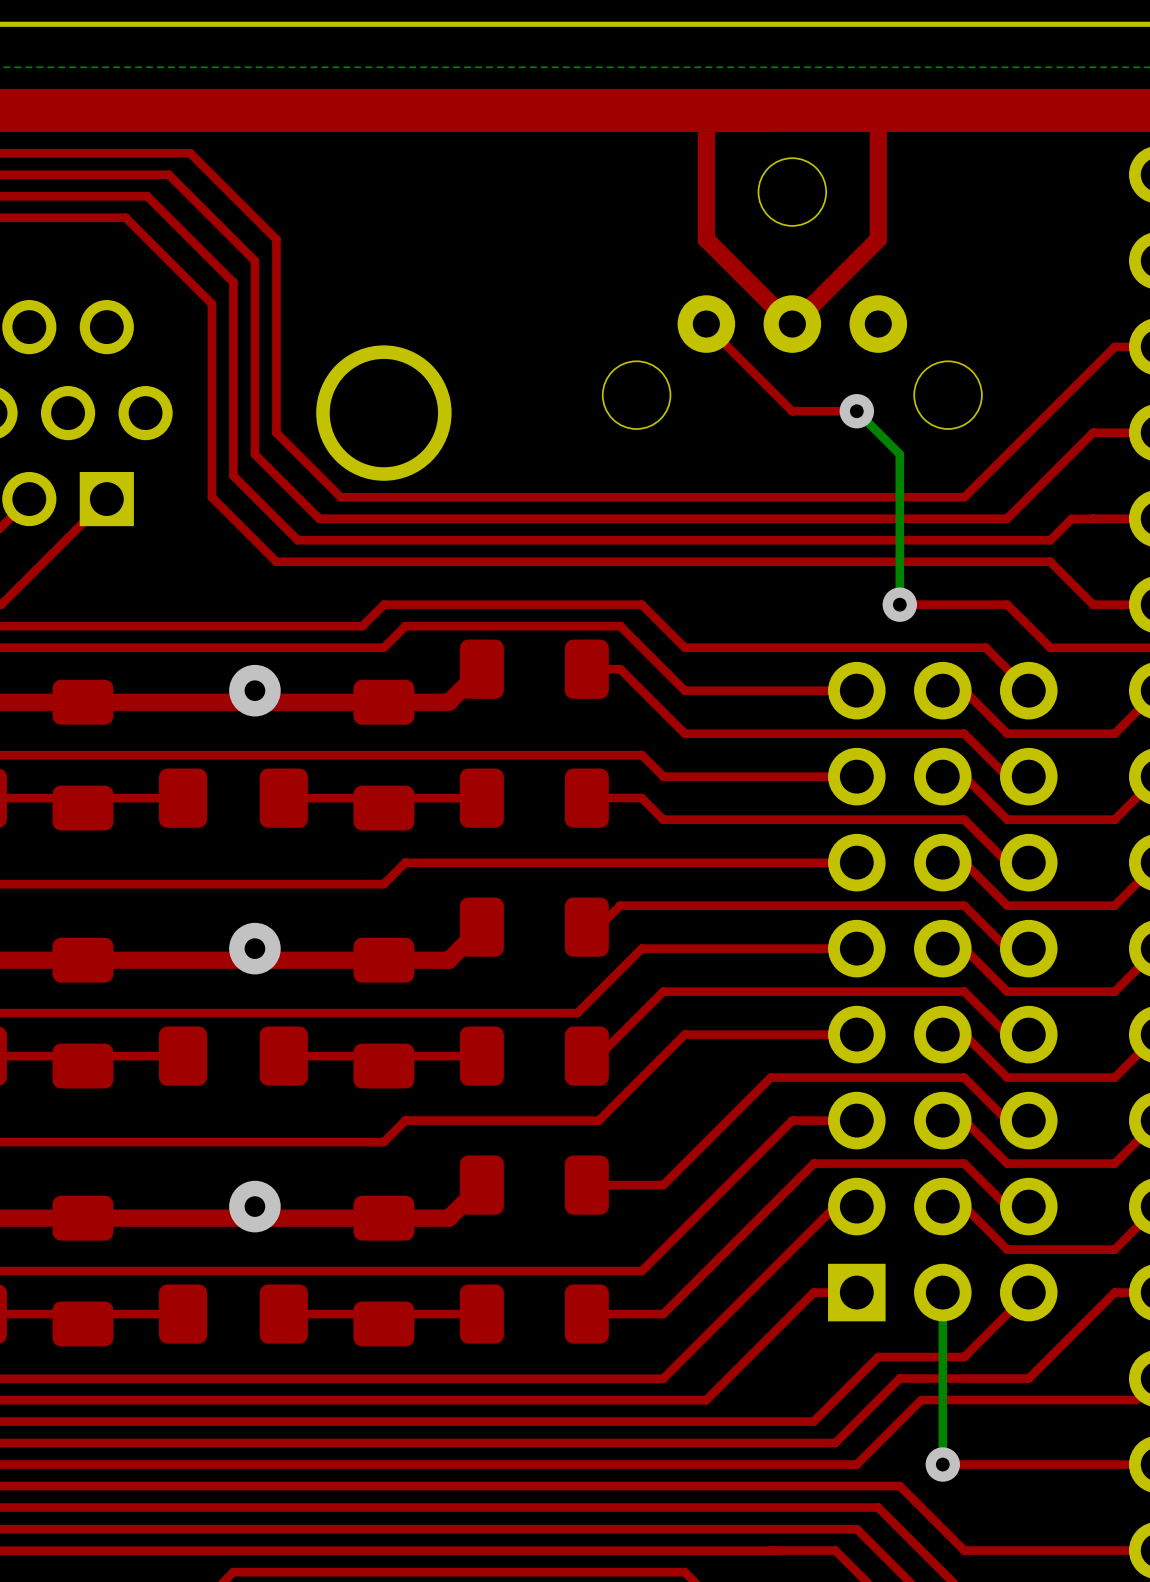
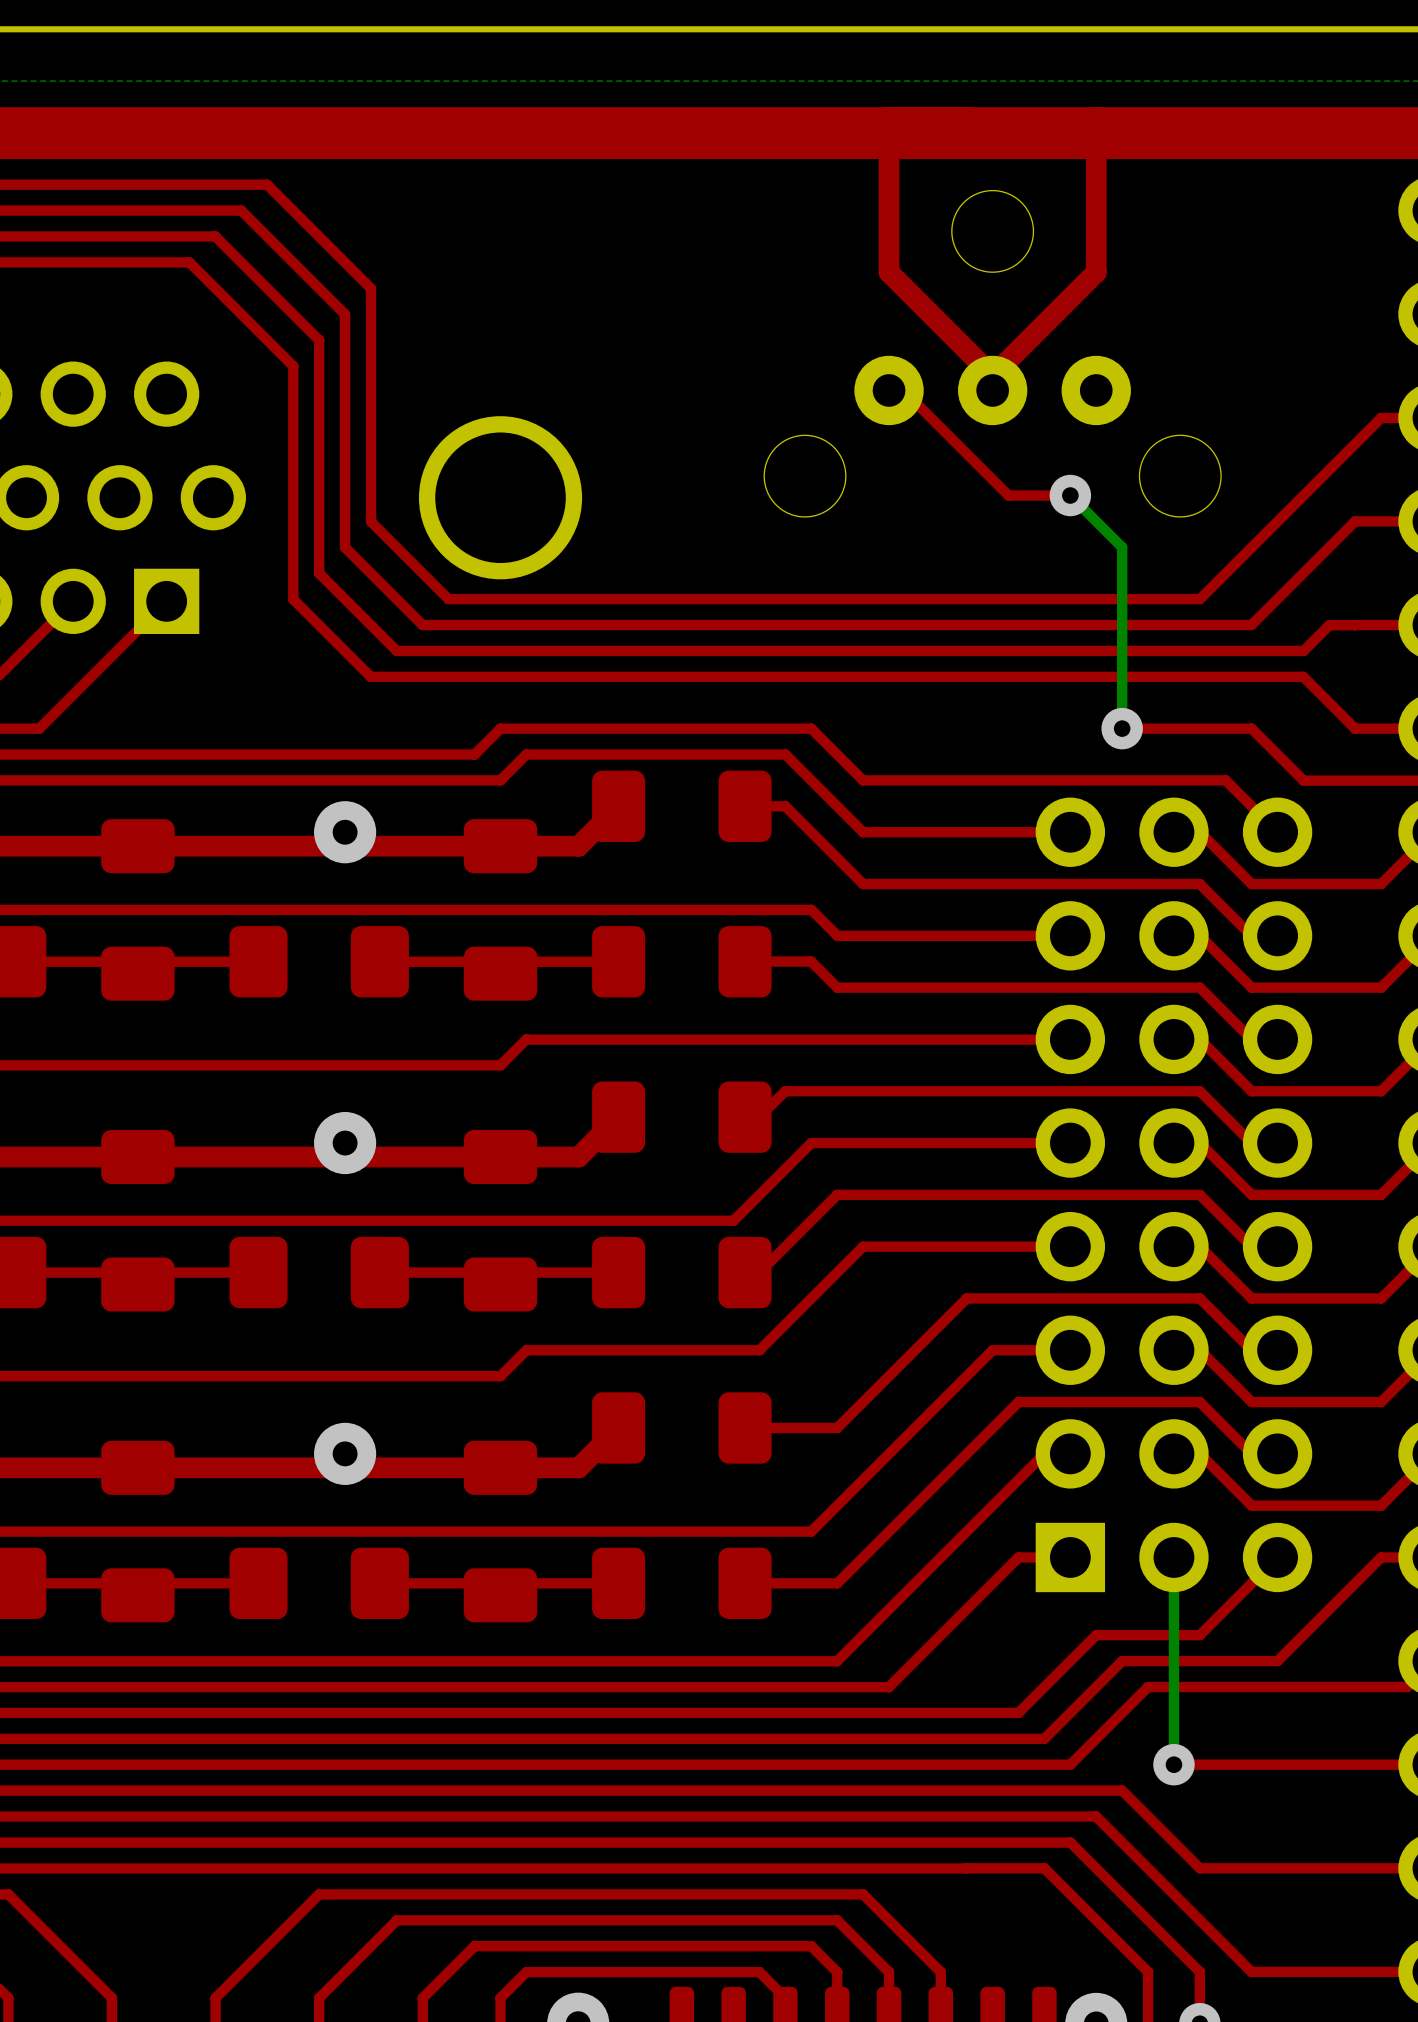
top track: (706, 226) (706, 239) (790, 324) -> none
top track: (878, 226) (878, 239) (793, 324) -> (1096, 272) (992, 375) (889, 272)
top track: (706, 325) (792, 411) (805, 411) -> (889, 375) (1008, 495)

